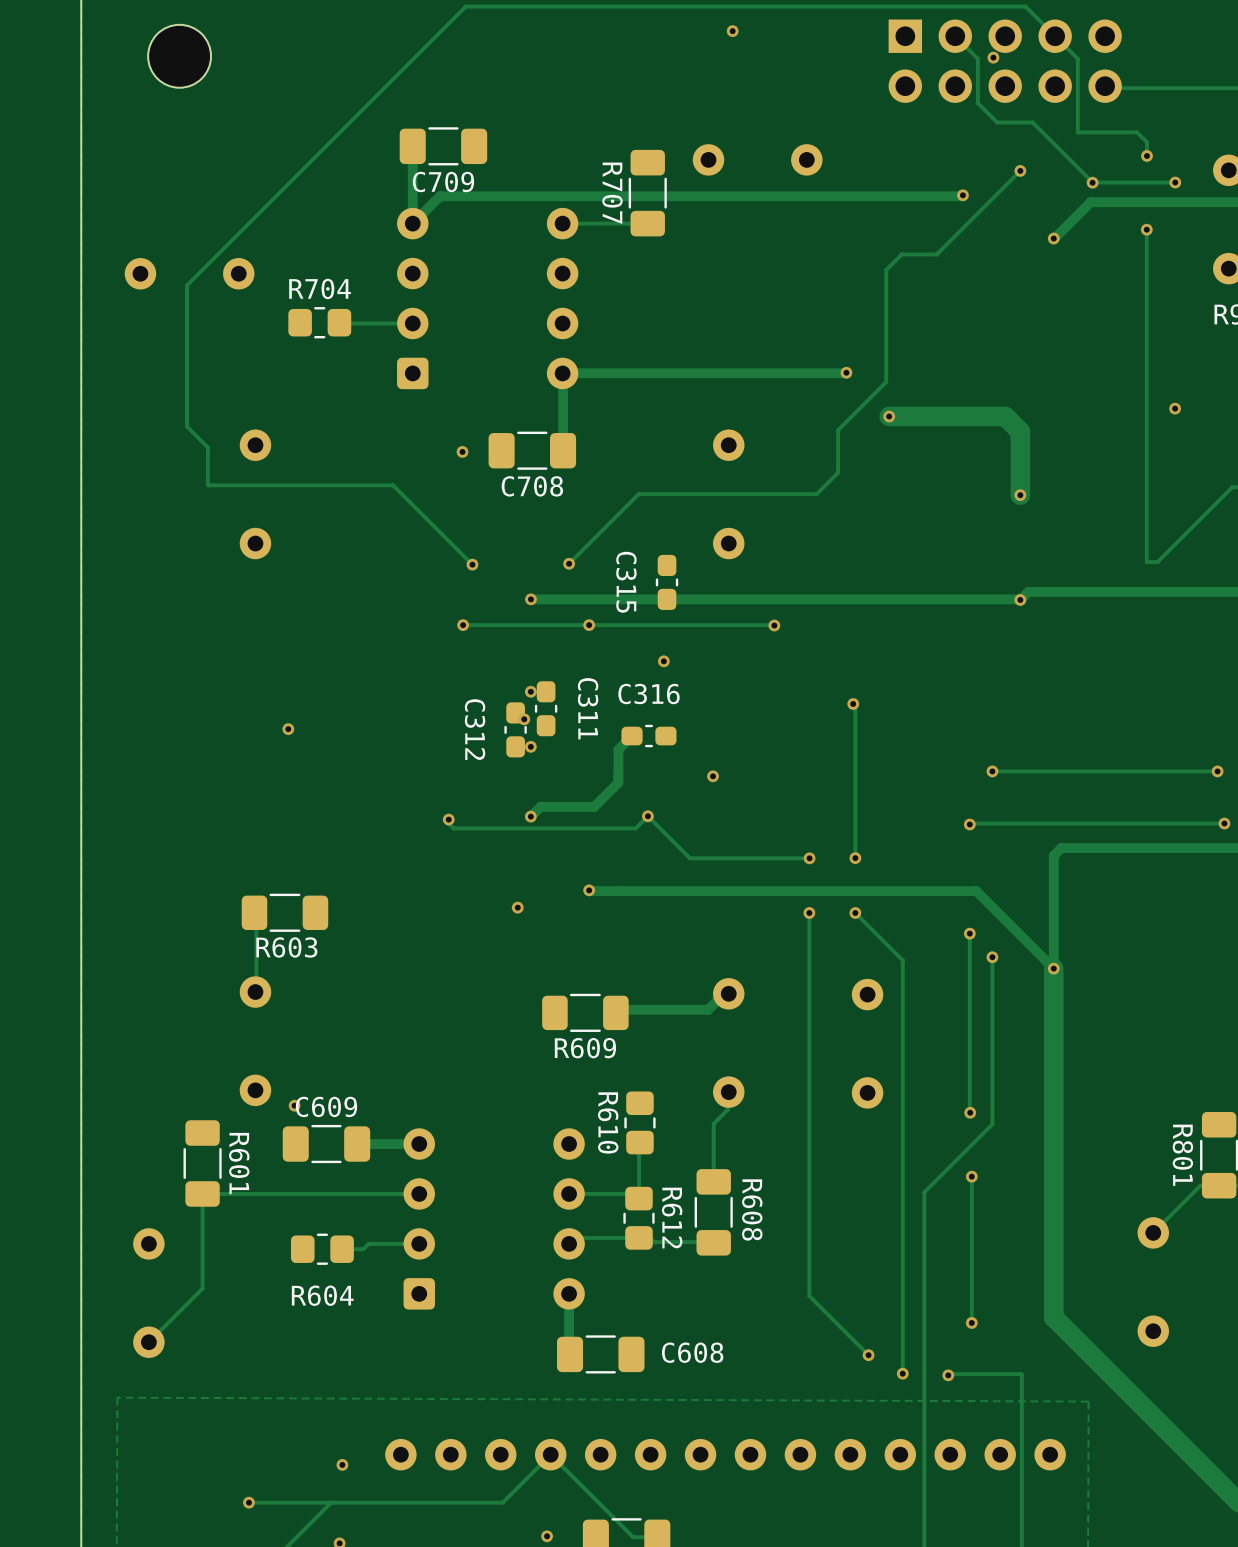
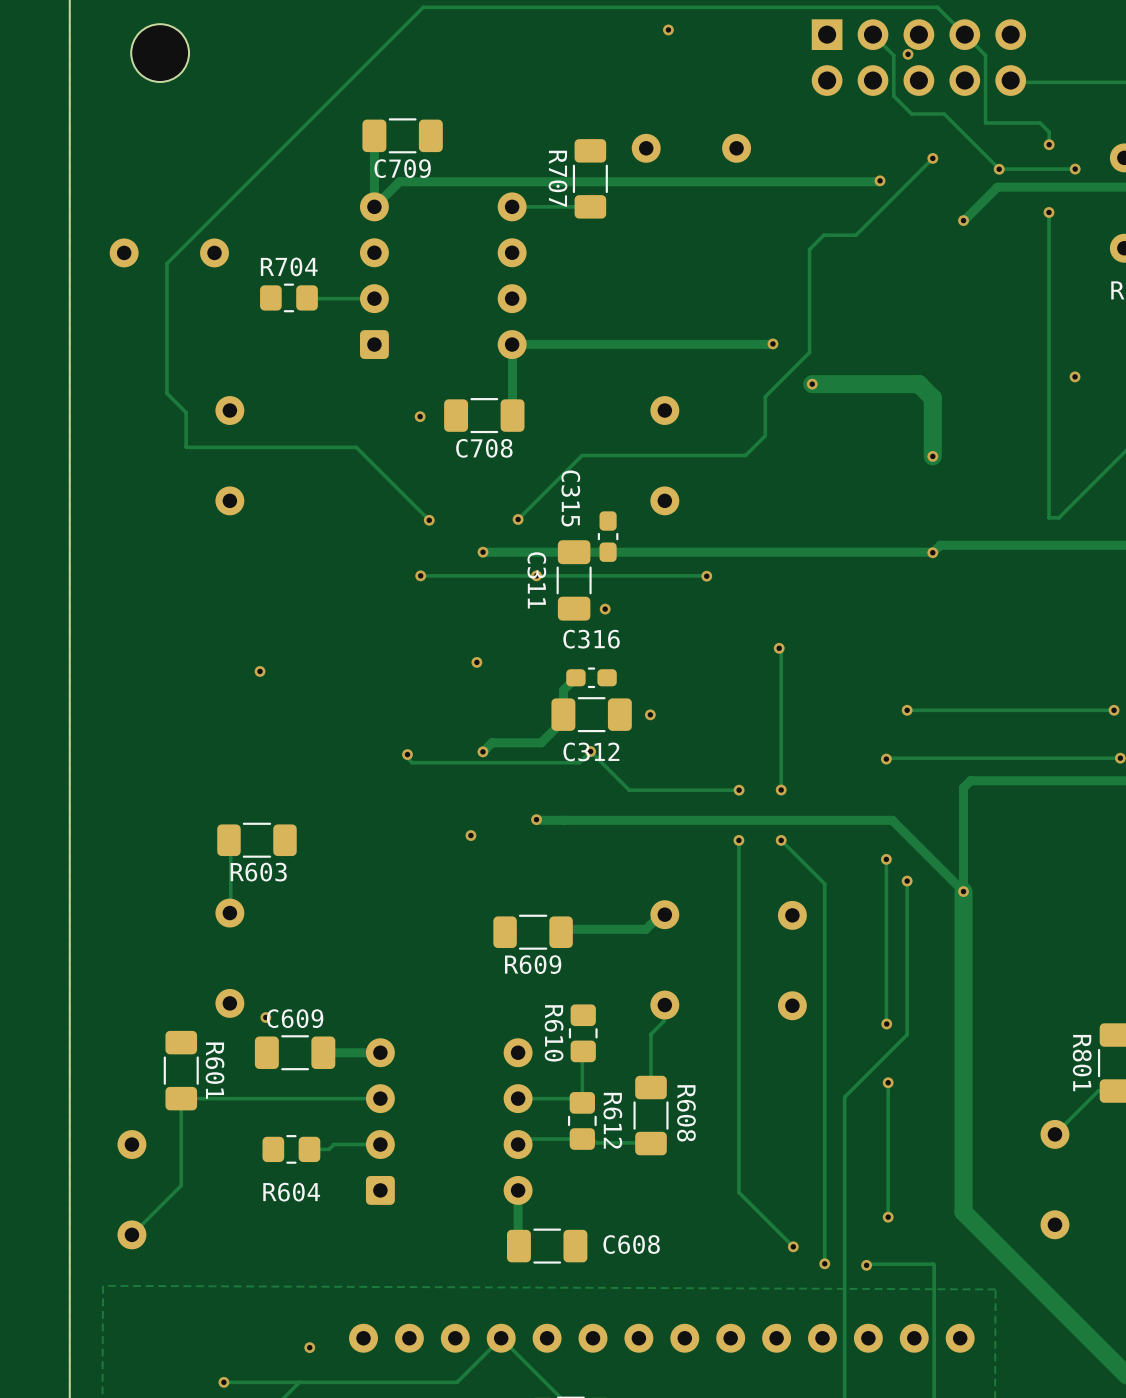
C315 name position: C315 (626, 582) -> C315 (570, 498)
C311 footprint: [534, 681, 558, 737] -> [556, 540, 592, 621]
via: (530, 691) -> none
C312 footprint: [504, 702, 527, 758] -> [551, 697, 632, 733]
C311 name position: C311 (588, 708) -> C311 (536, 580)
C312 name position: C312 (475, 729) -> C312 (591, 751)
via: (530, 746) -> none

